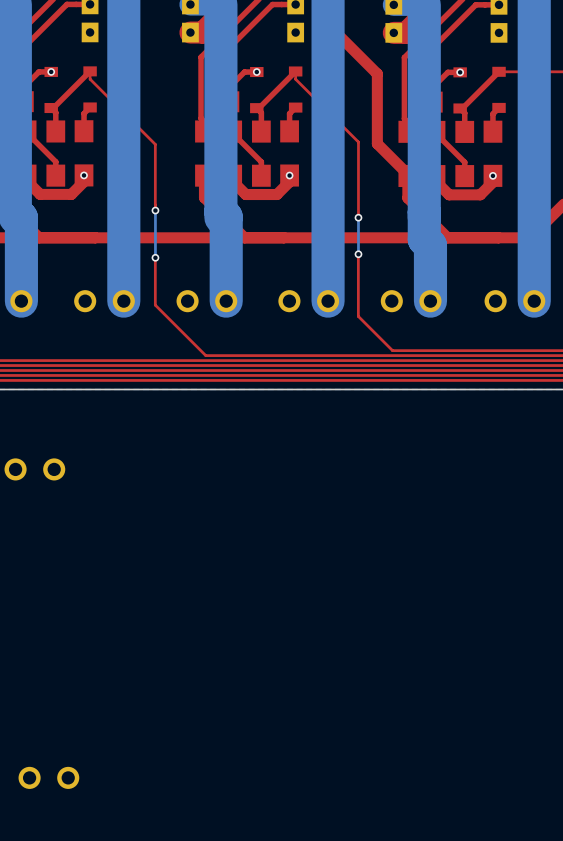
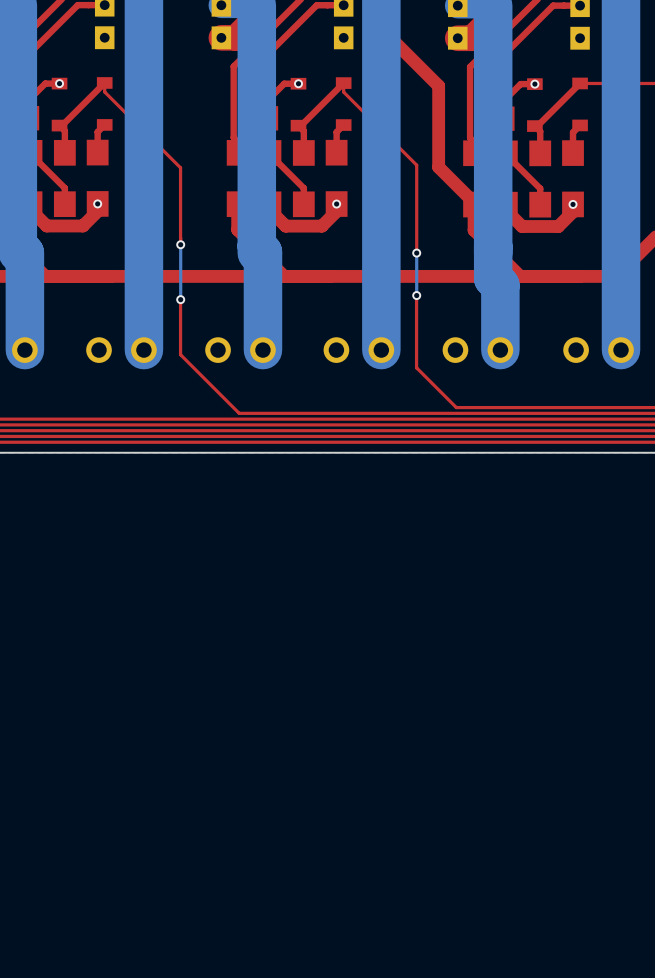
part: (34, 469) -> none
part: (48, 777) -> none

